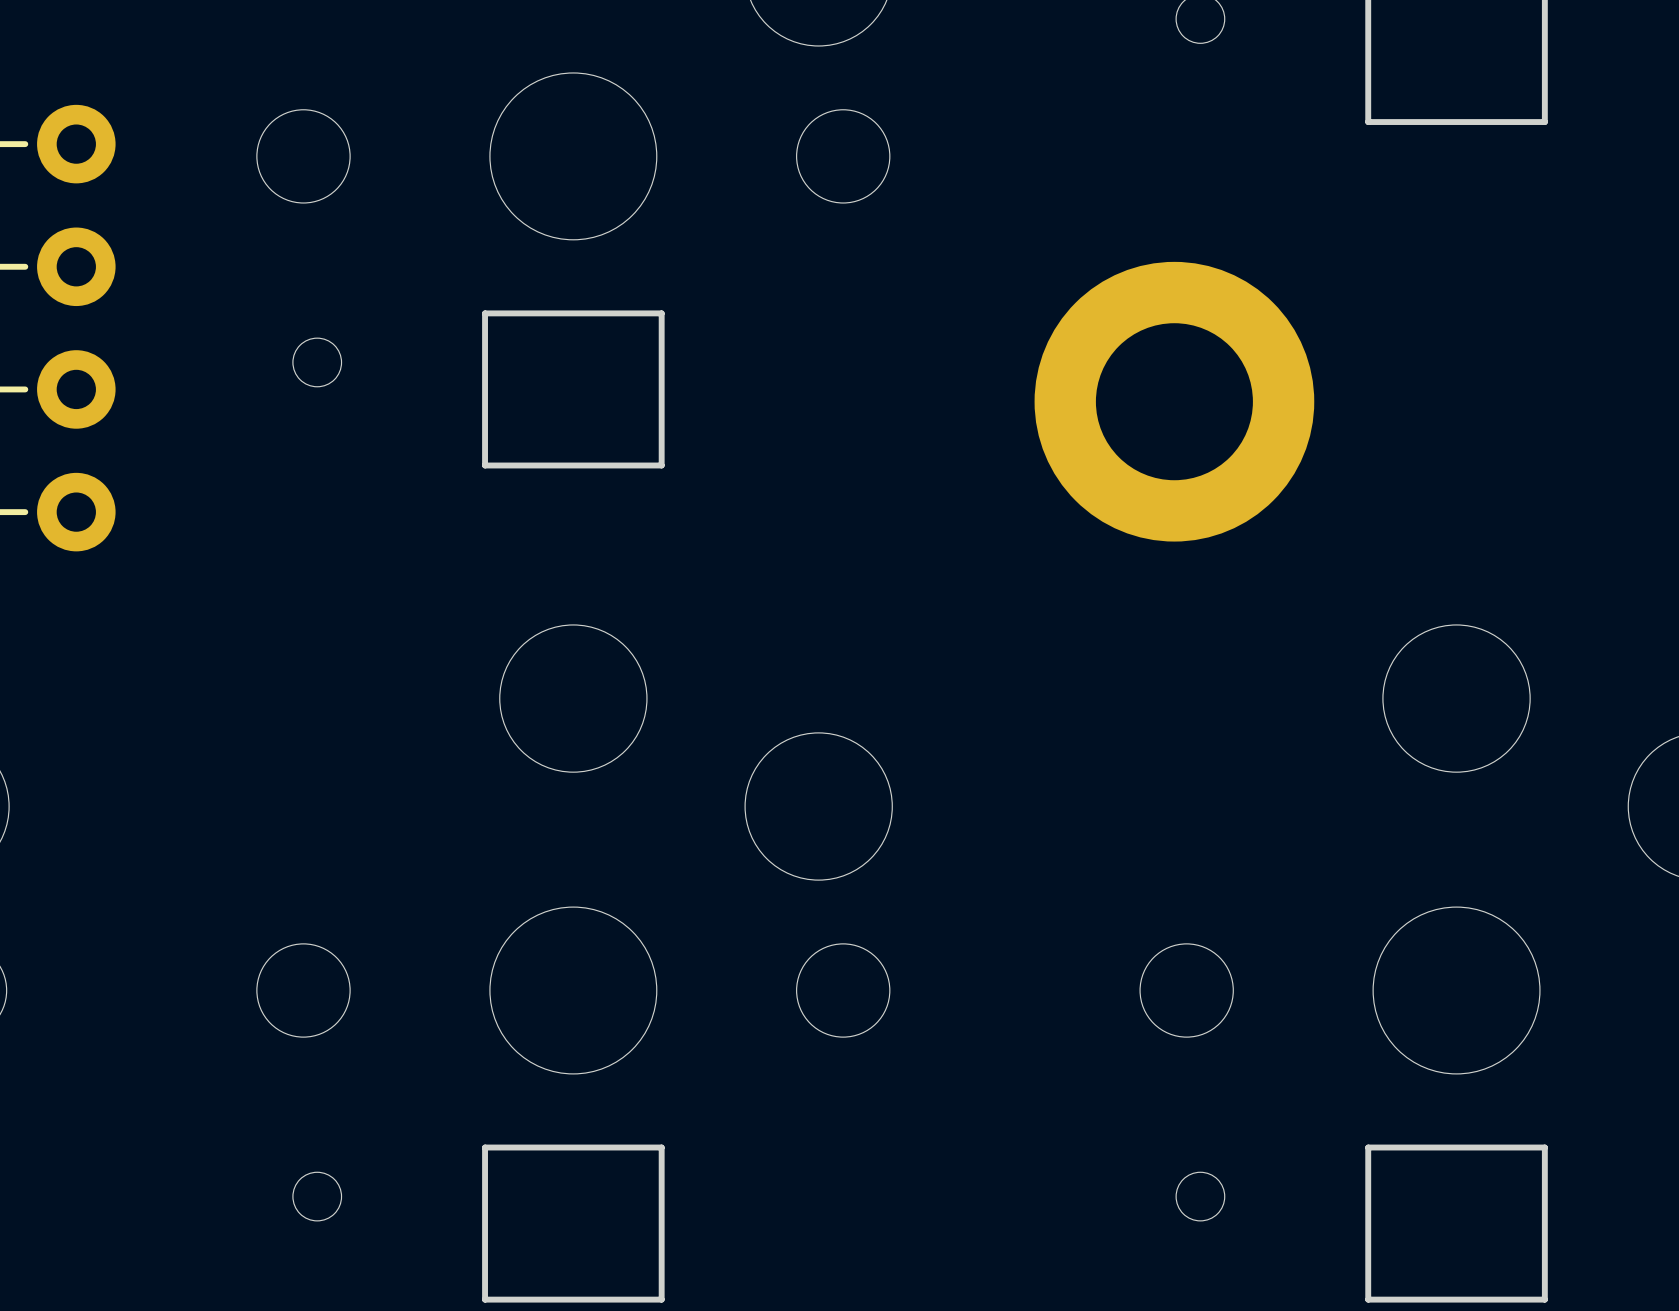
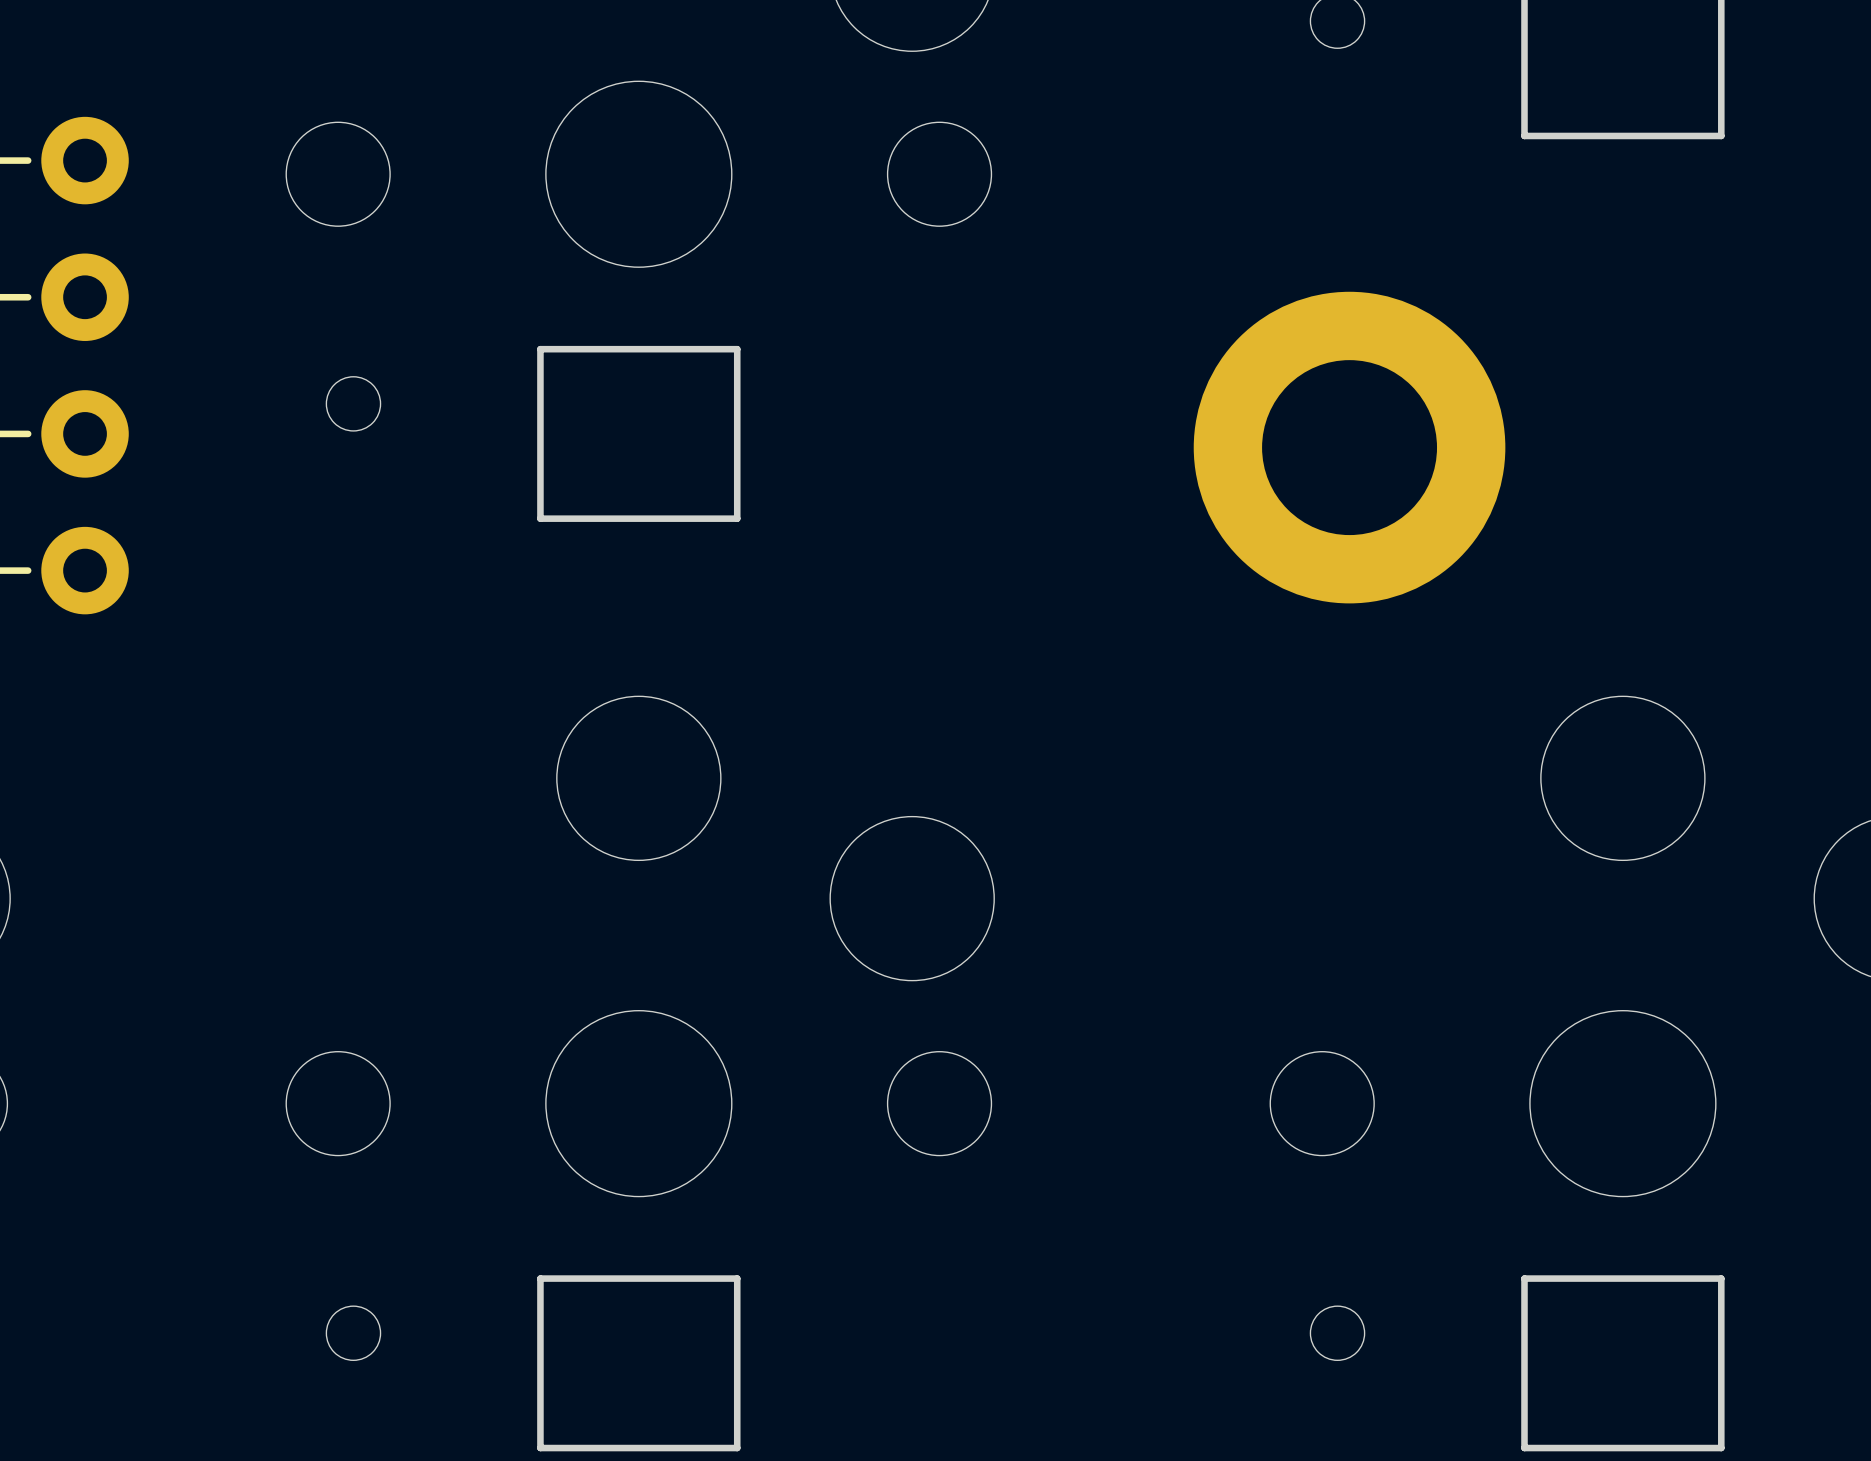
part position: (1174, 401) -> (1349, 447)

